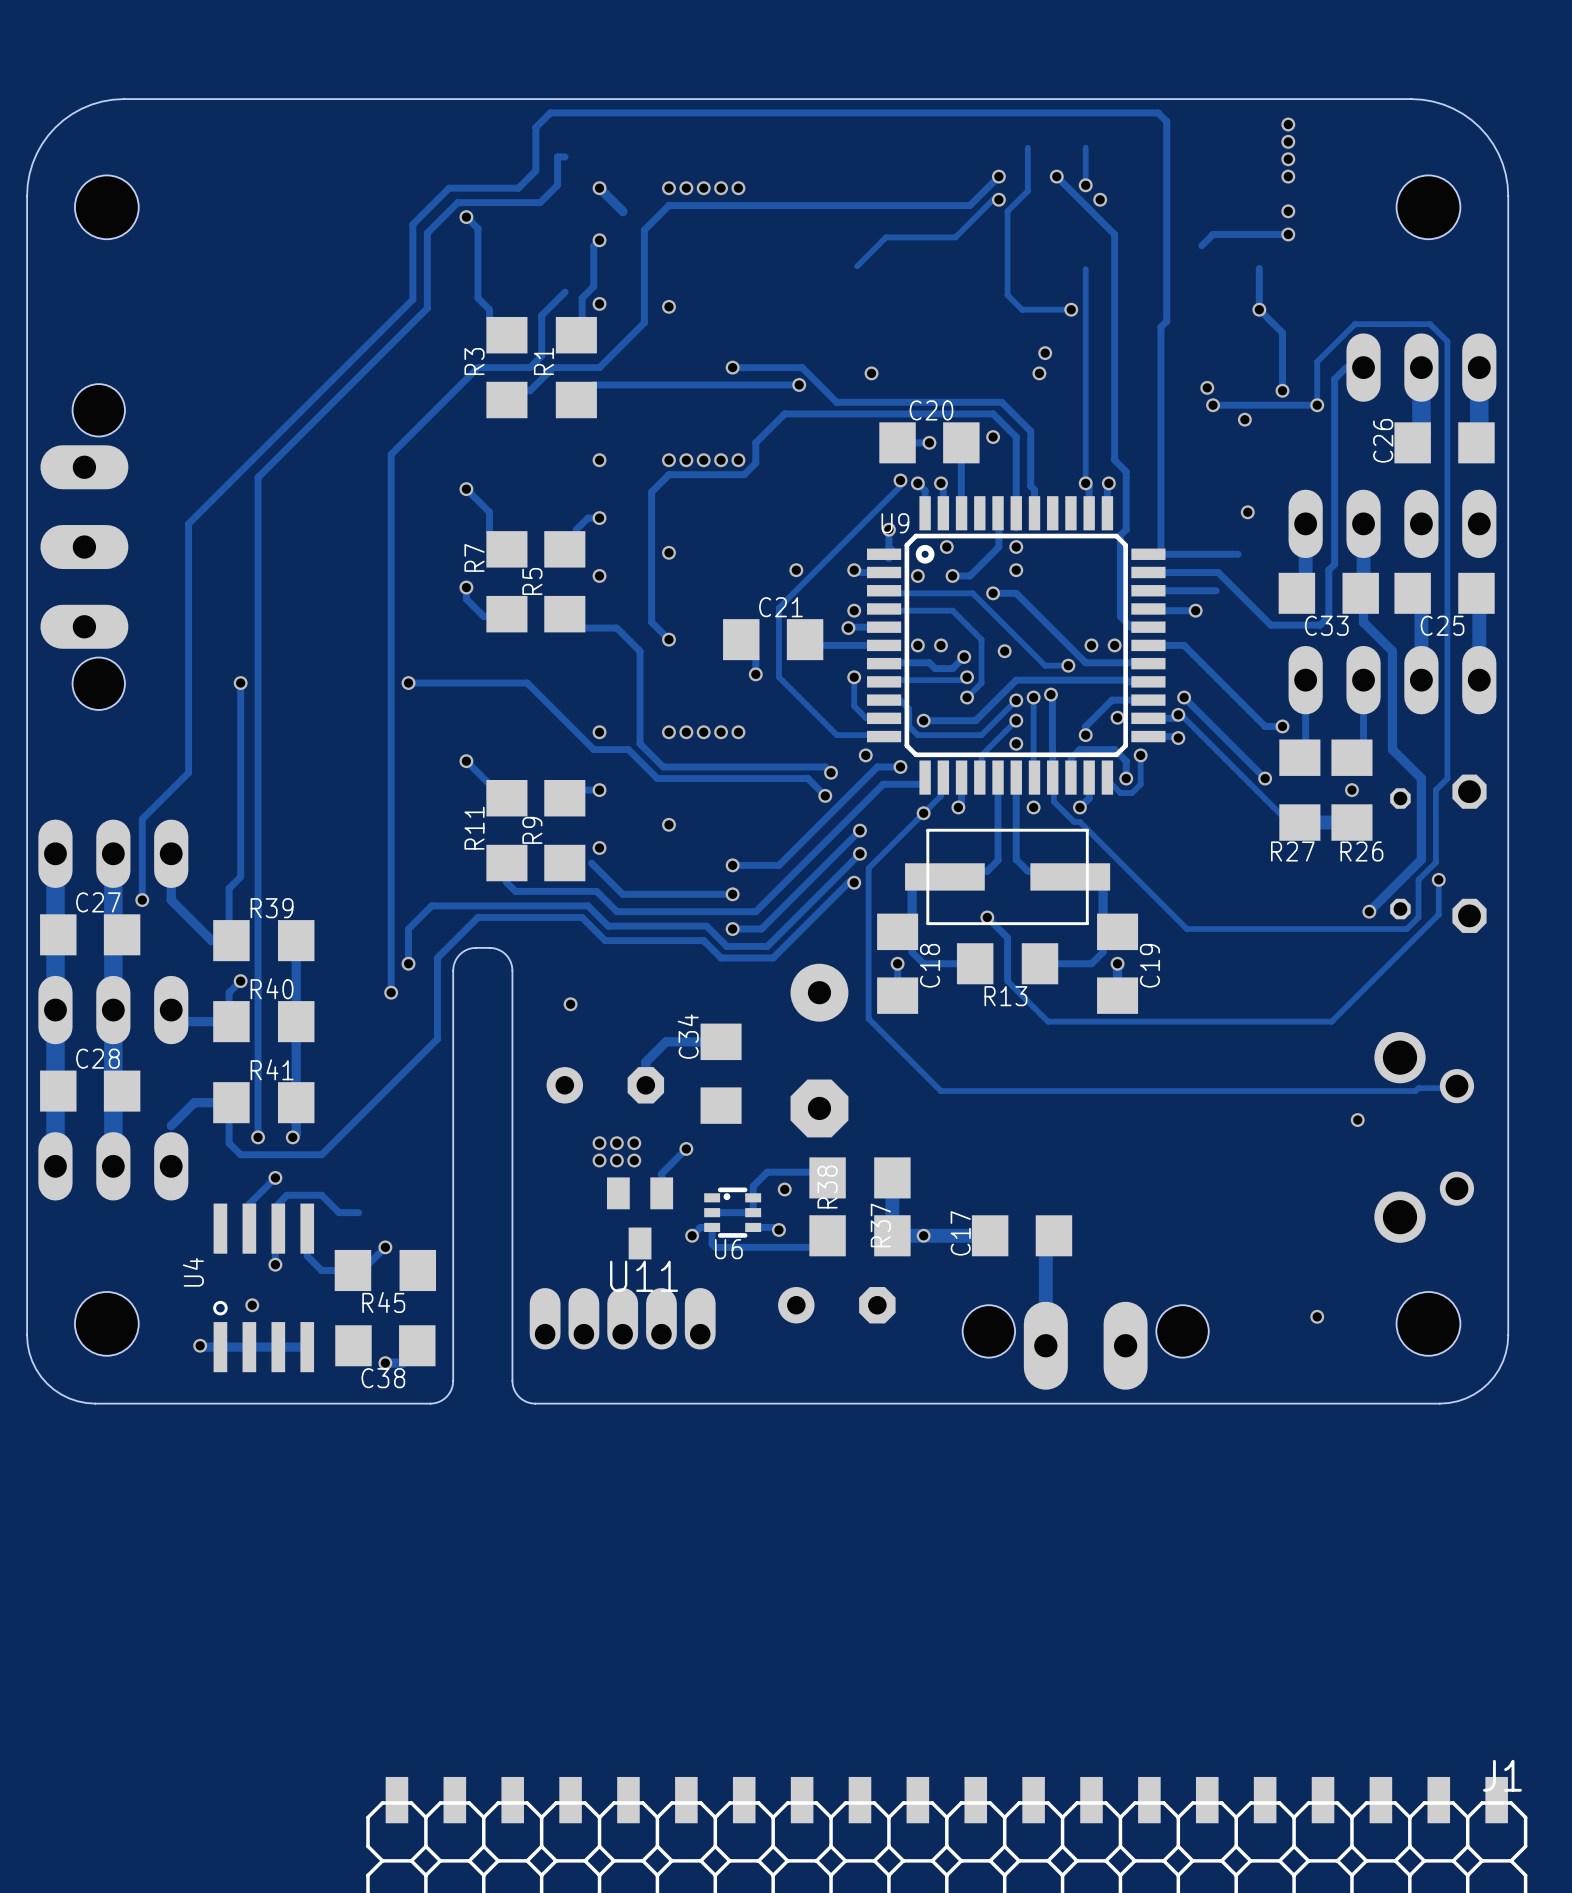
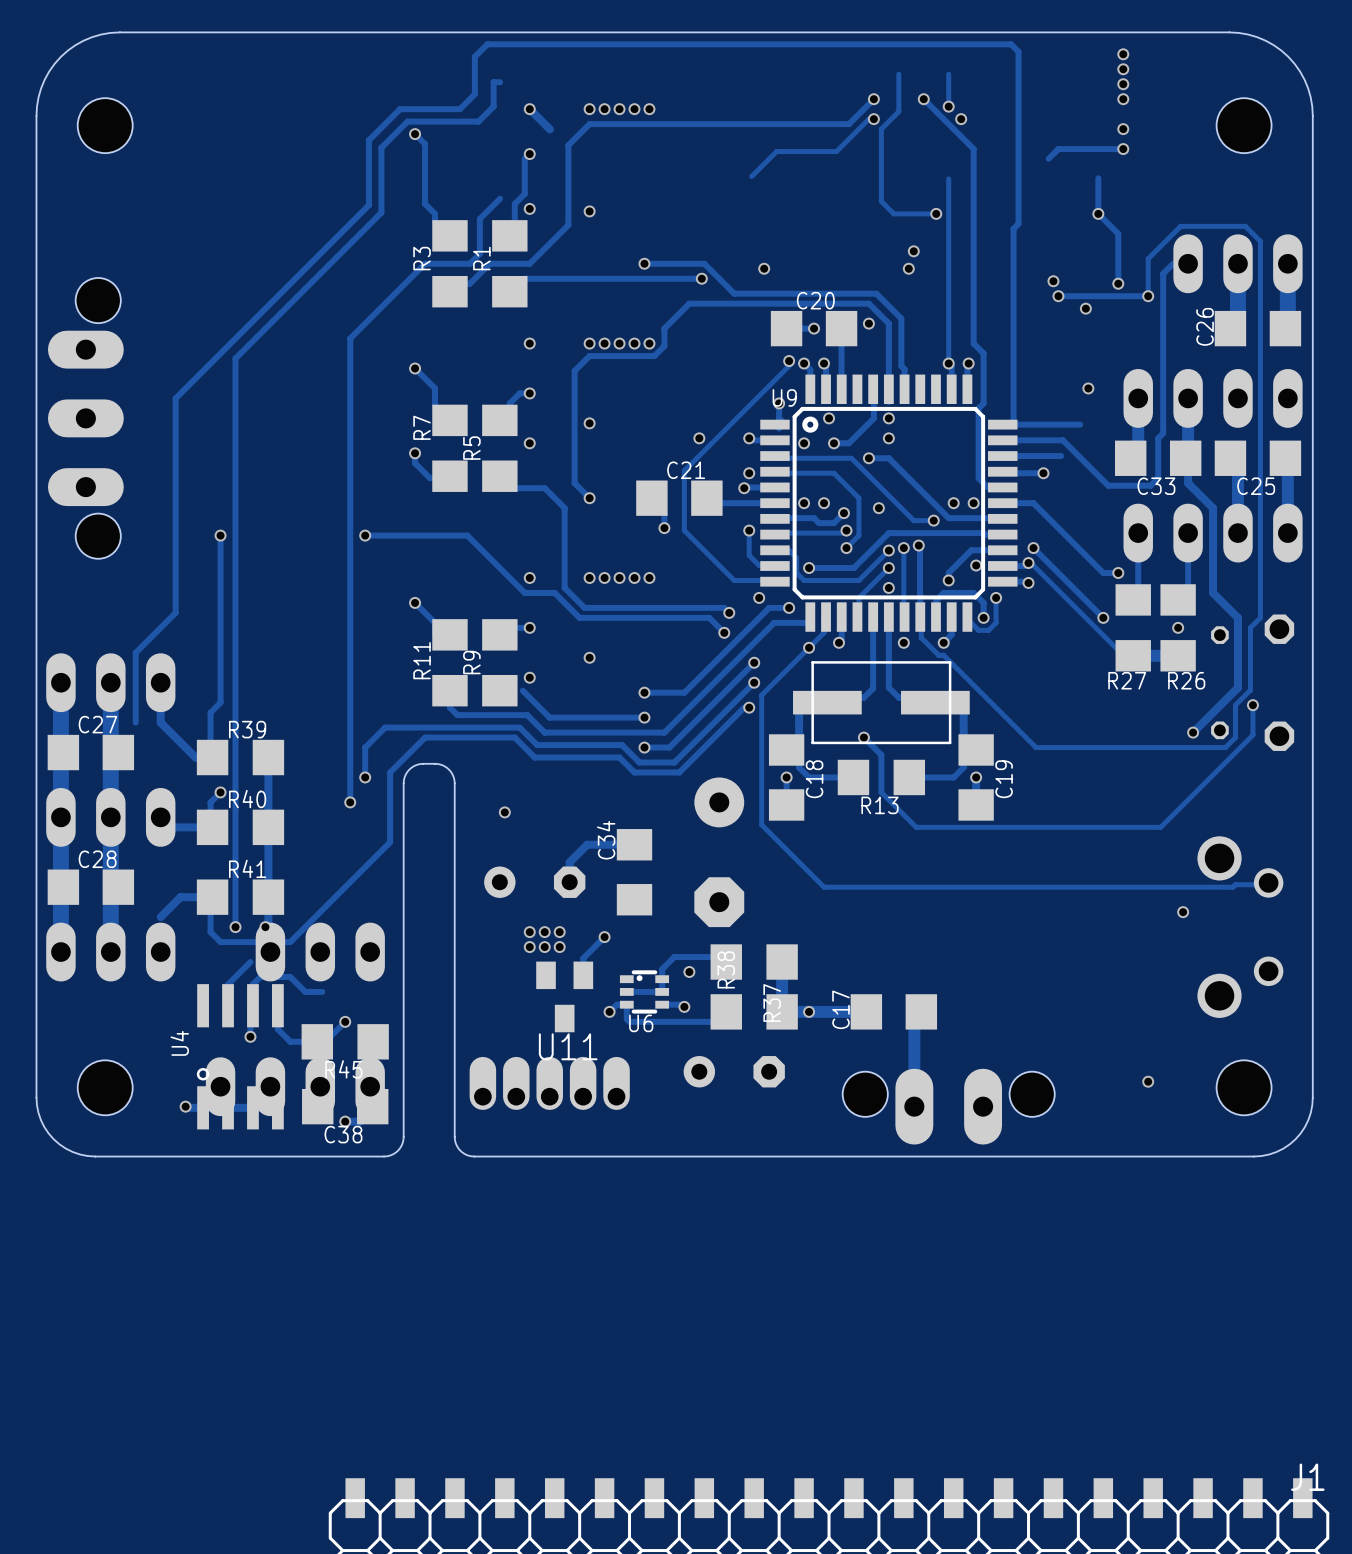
via: (142, 900) -> none
part: none -> (320, 952)
via: (275, 1177) -> none
via: (252, 1305) -> none
part: none -> (295, 1086)

